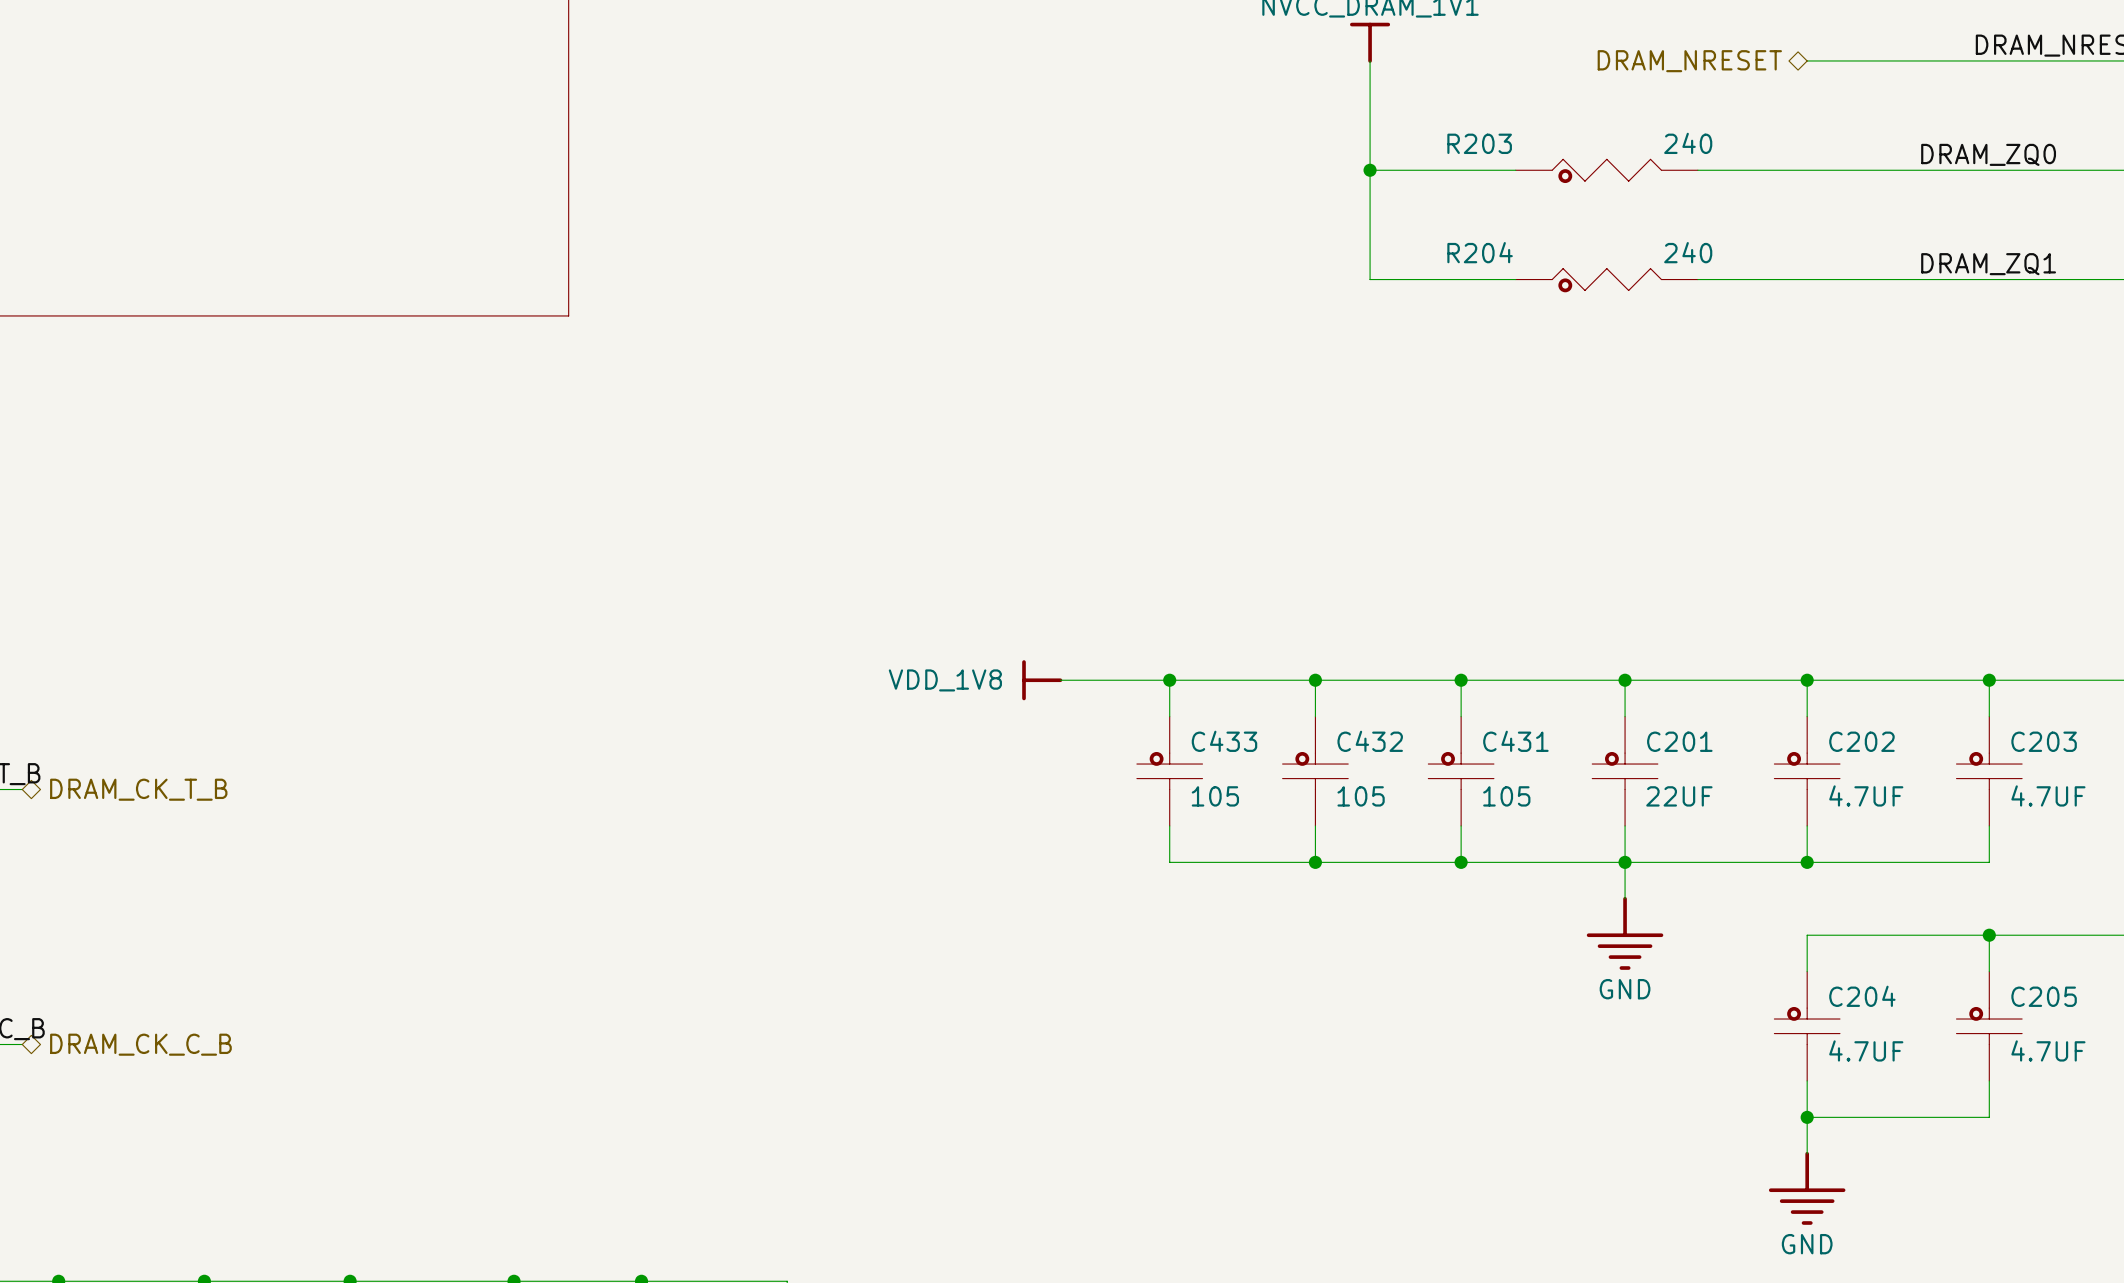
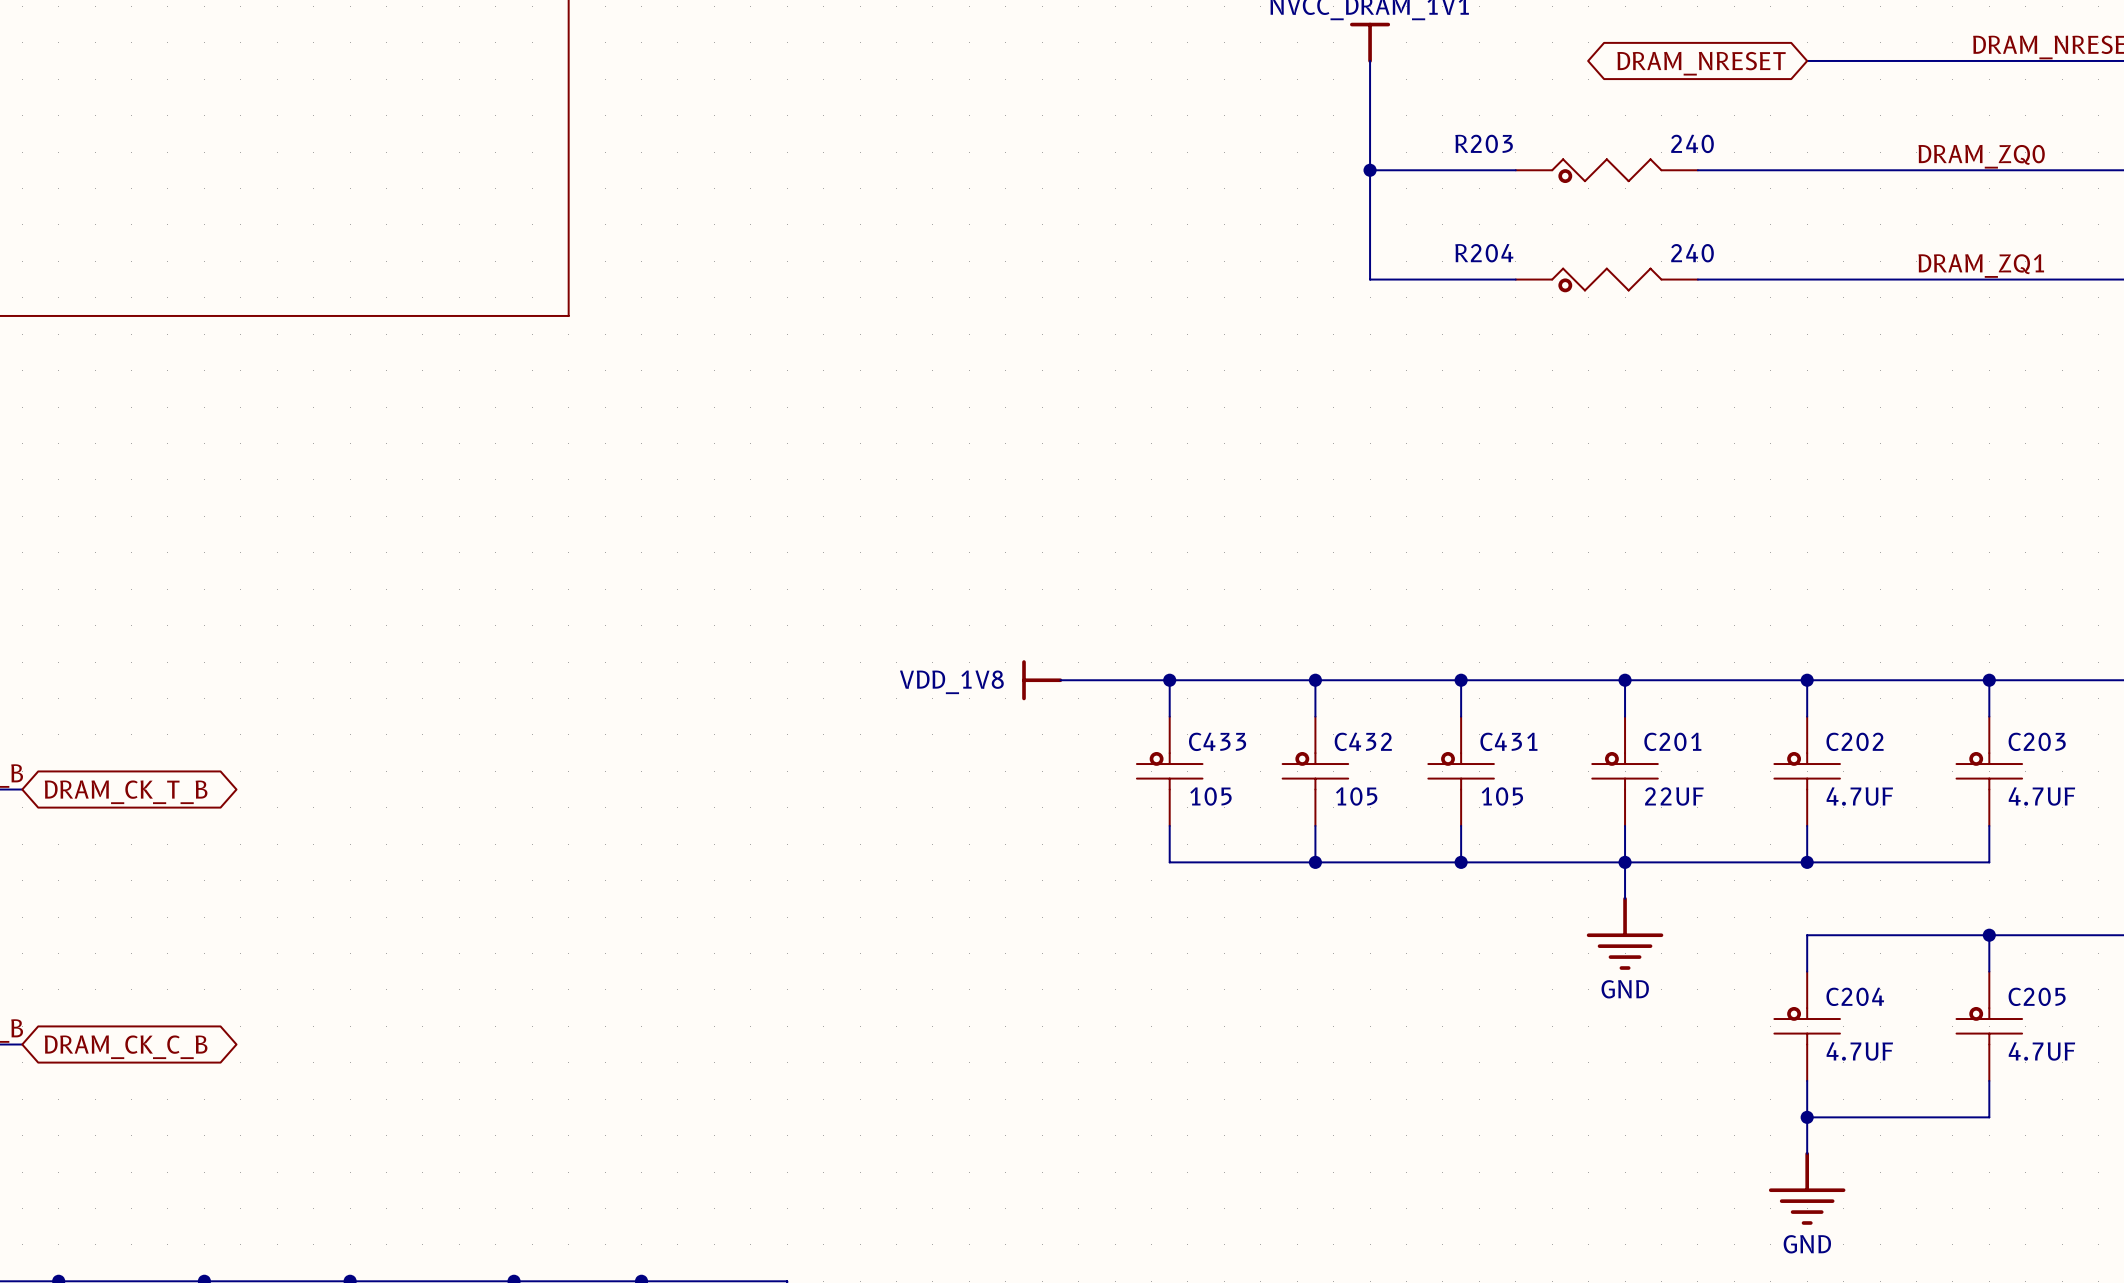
hierarchical label: DRAM_NRESET (1689, 61) -> none
global label: none -> DRAM_NRESET (1701, 63)
hierarchical label: DRAM_CK_T_B (138, 789) -> none
global label: none -> DRAM_CK_T_B (126, 792)
hierarchical label: DRAM_CK_C_B (140, 1044) -> none
global label: none -> DRAM_CK_C_B (126, 1047)

